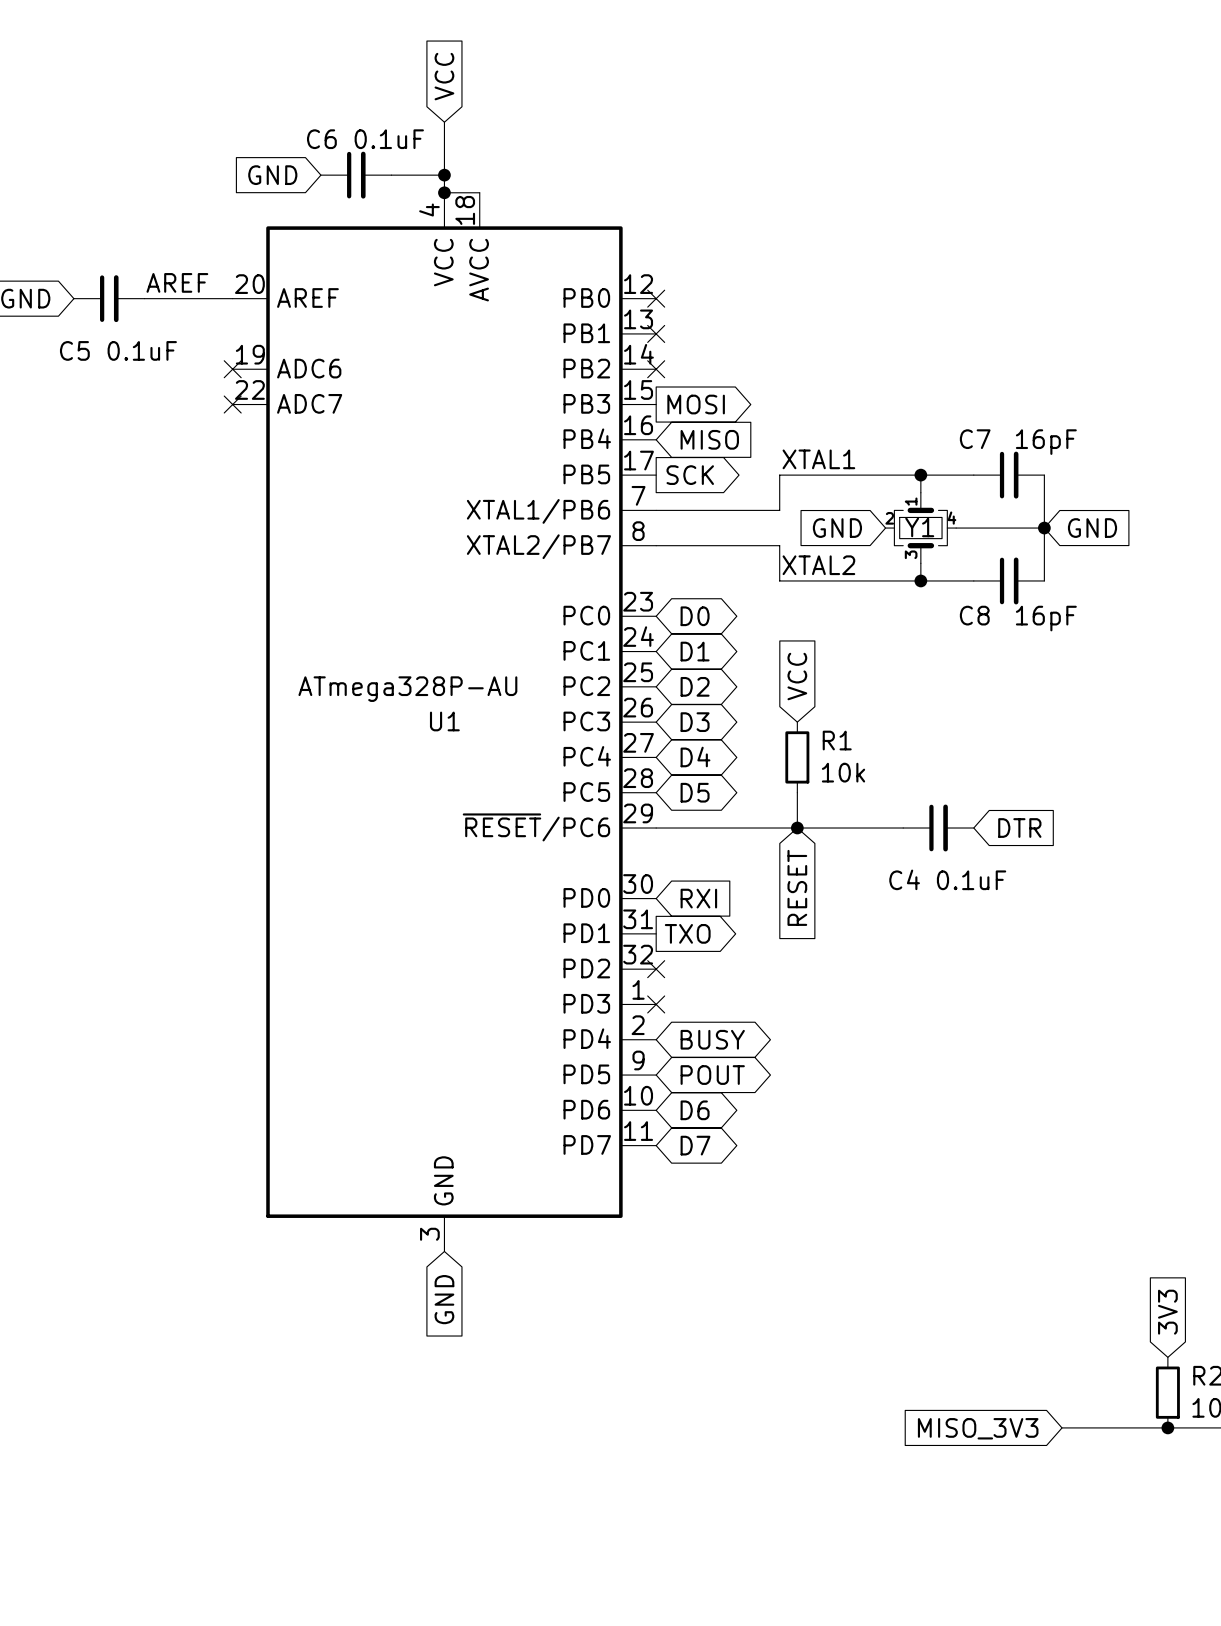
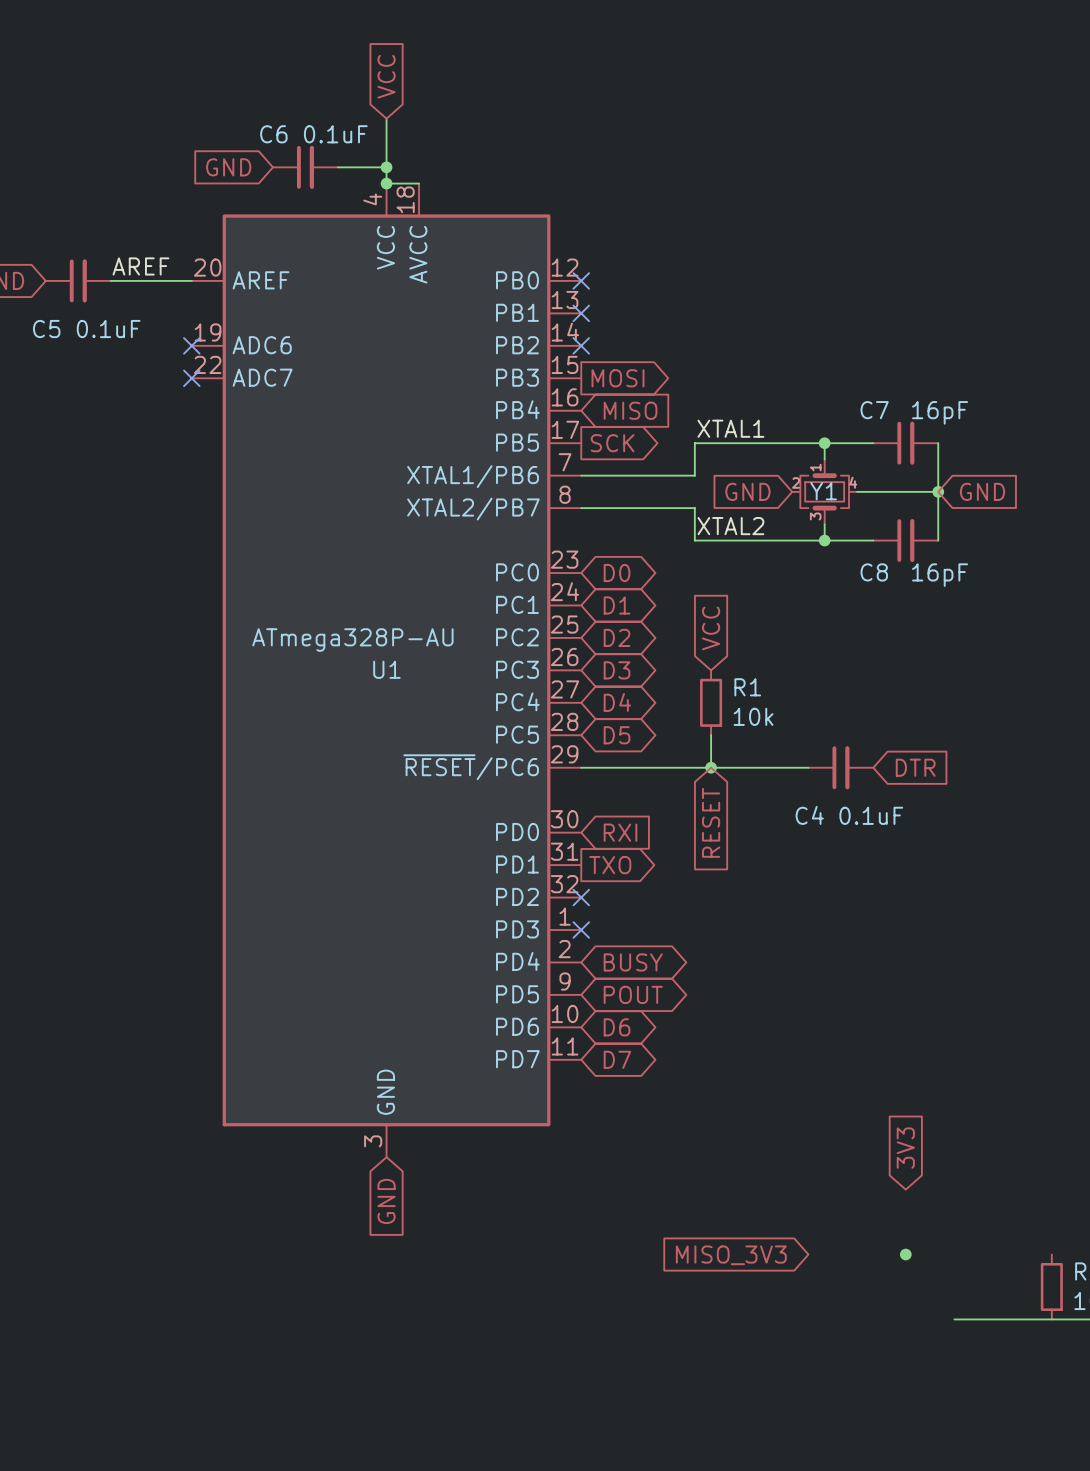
global label position: 3V3 (1167, 1312) -> 3V3 (905, 1148)
junction: none -> (905, 1254)
junction: (1167, 1427) -> none
global label position: MISO_3V3 (978, 1428) -> MISO_3V3 (731, 1255)

